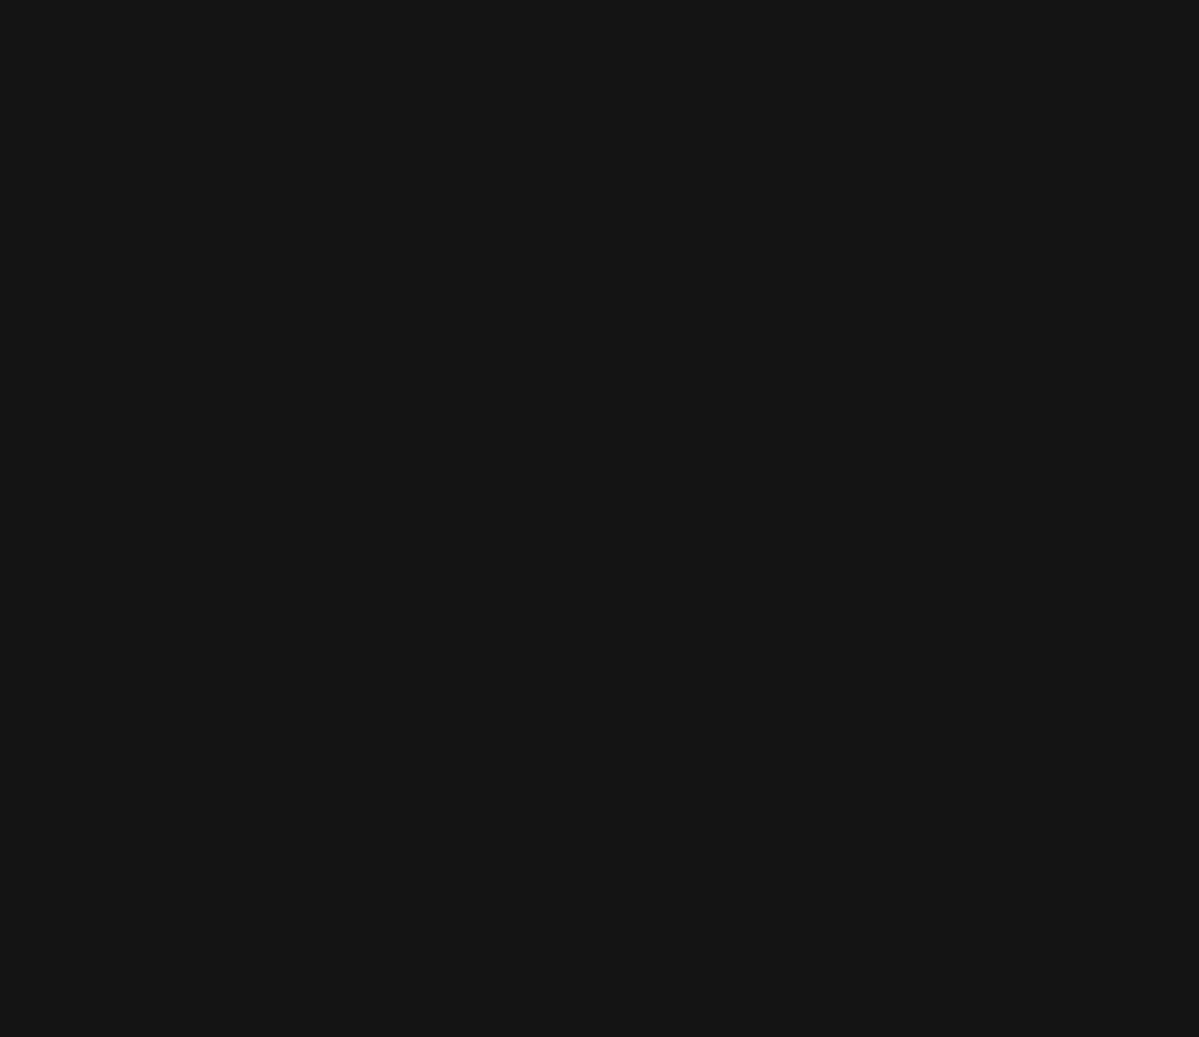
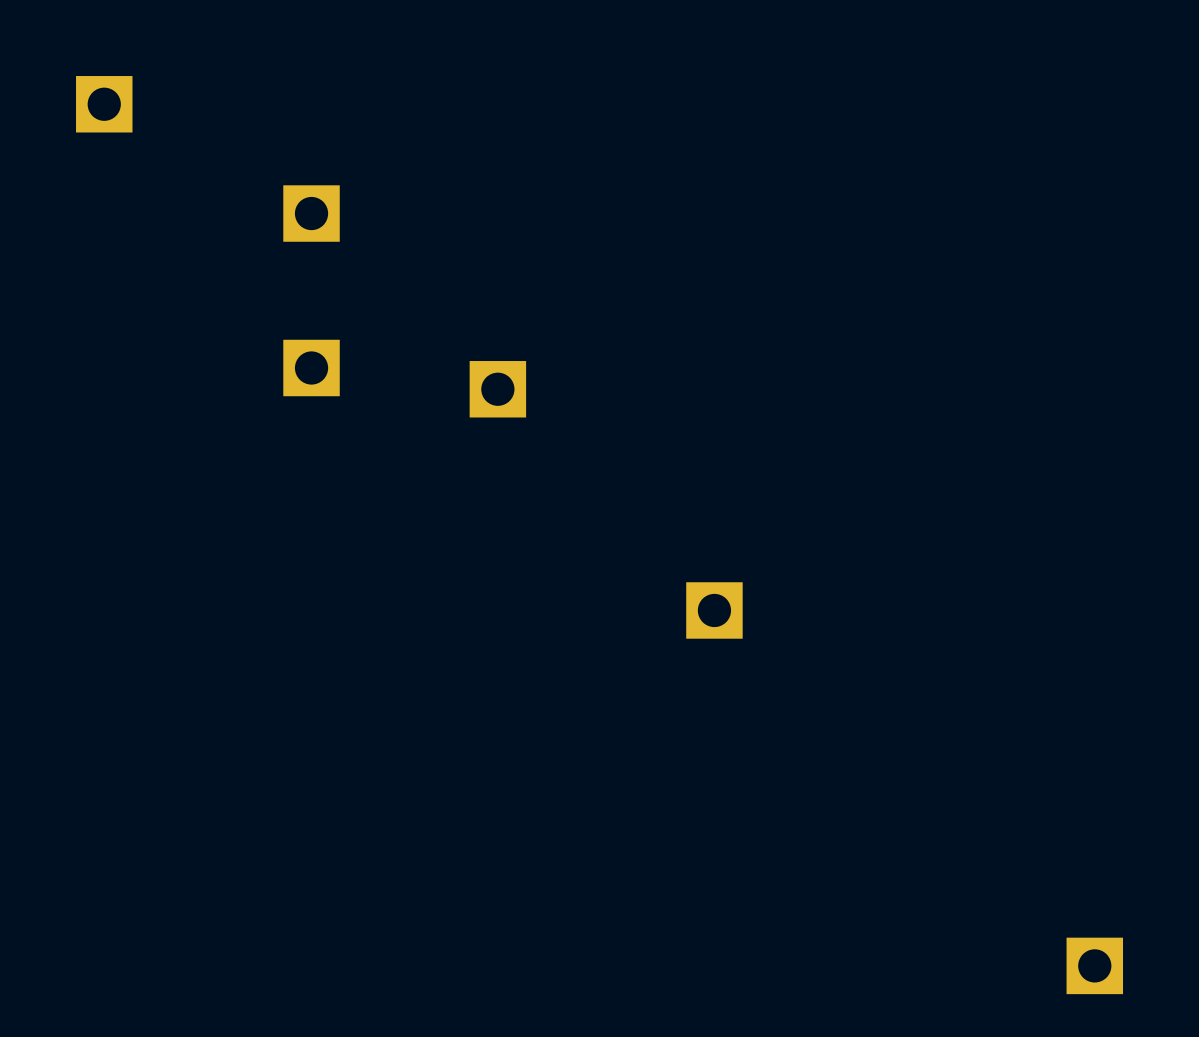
part: none -> (104, 104)
part: none -> (311, 213)
part: none -> (311, 367)
part: none -> (497, 389)
part: none -> (714, 610)
part: none -> (1094, 965)

